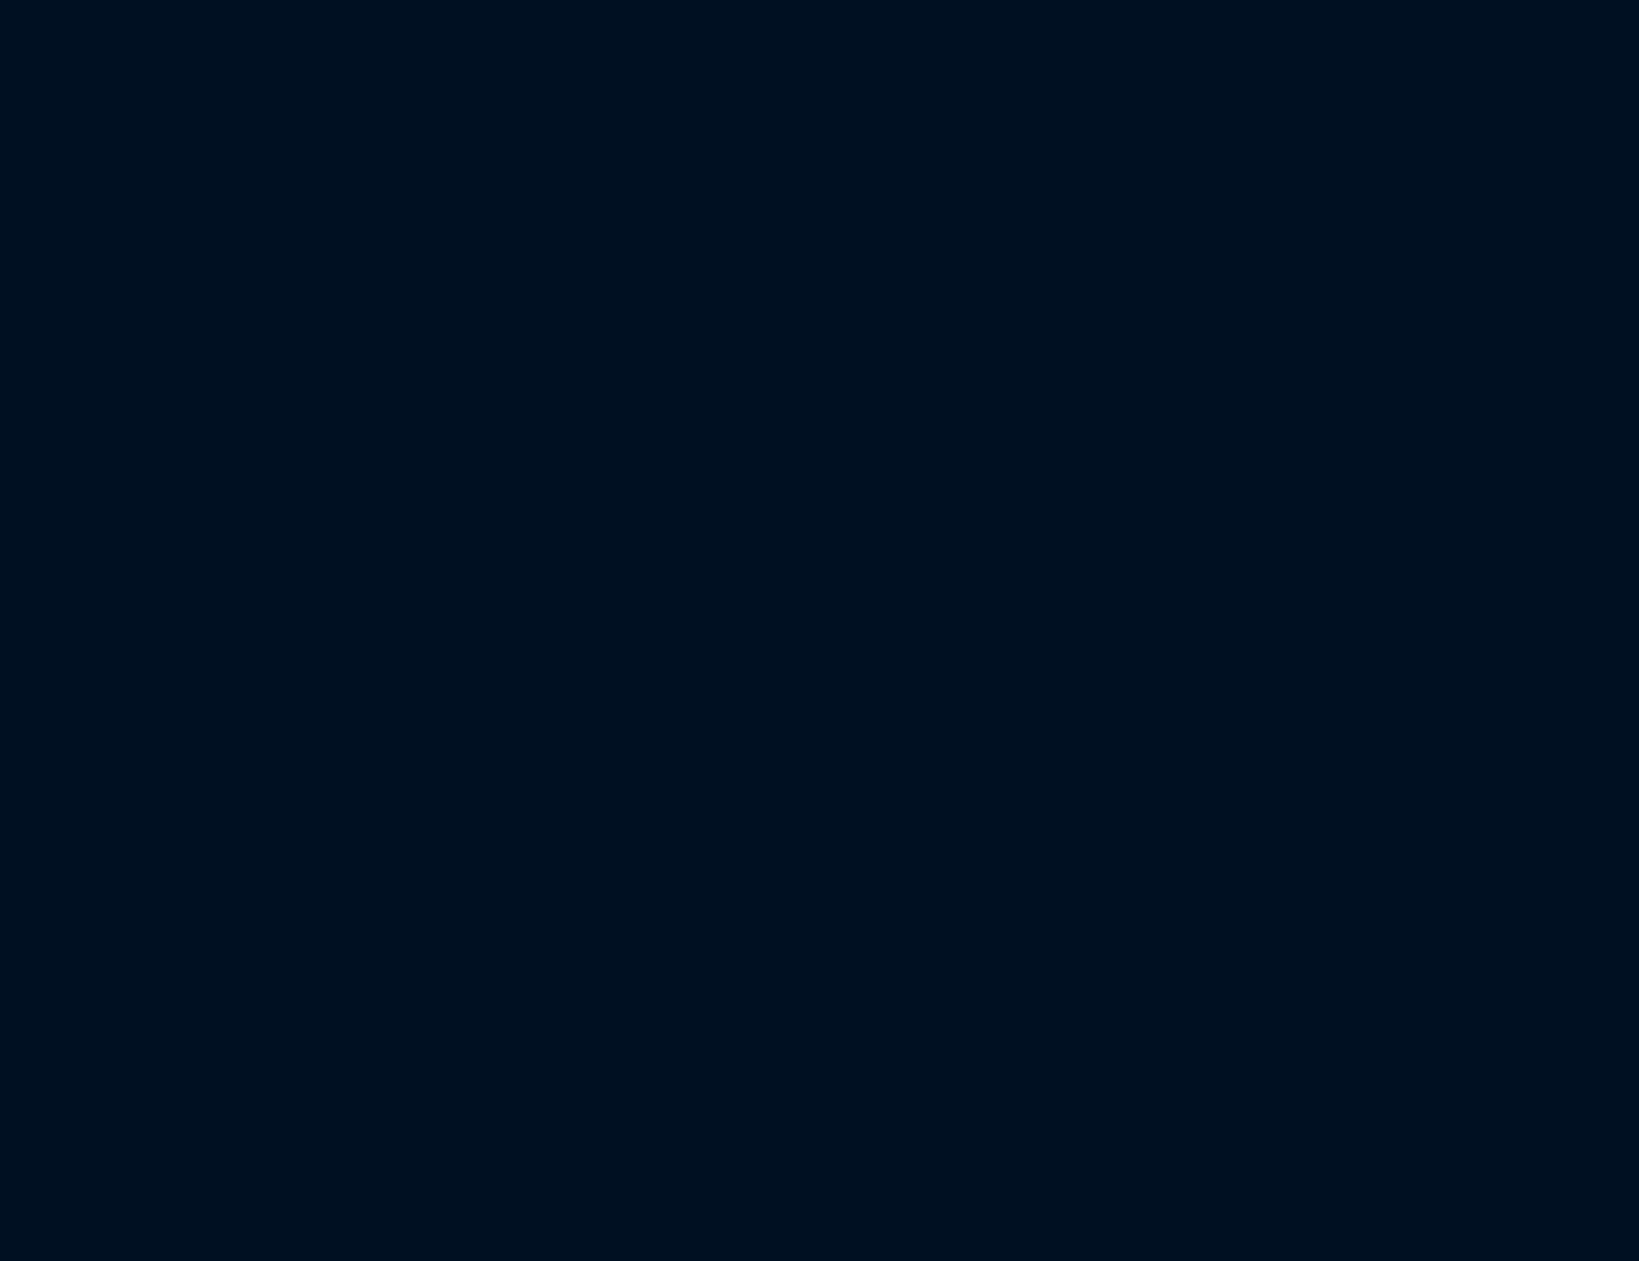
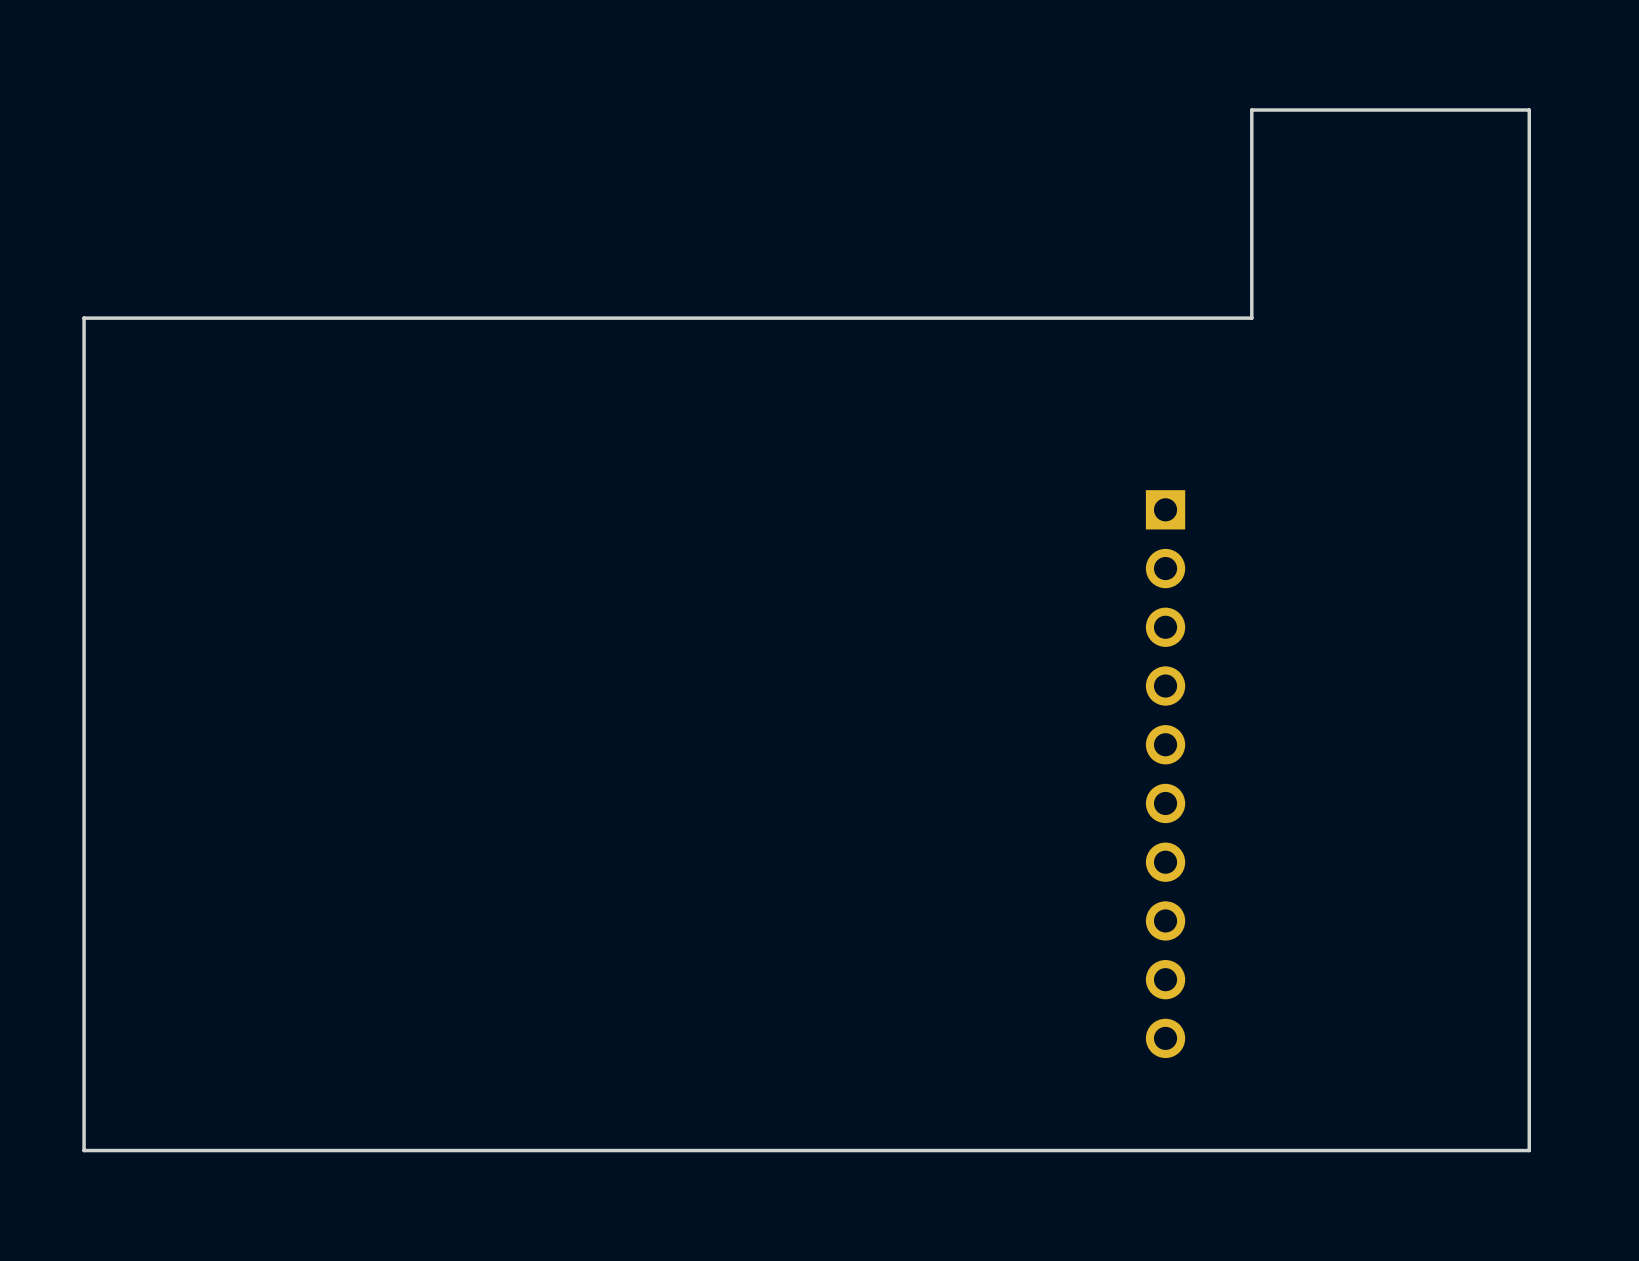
board edge: none -> (1529, 110) (1251, 110) (1251, 318) (84, 318) (84, 1150) (1529, 1150) (1529, 110)
part: none -> (1165, 774)

